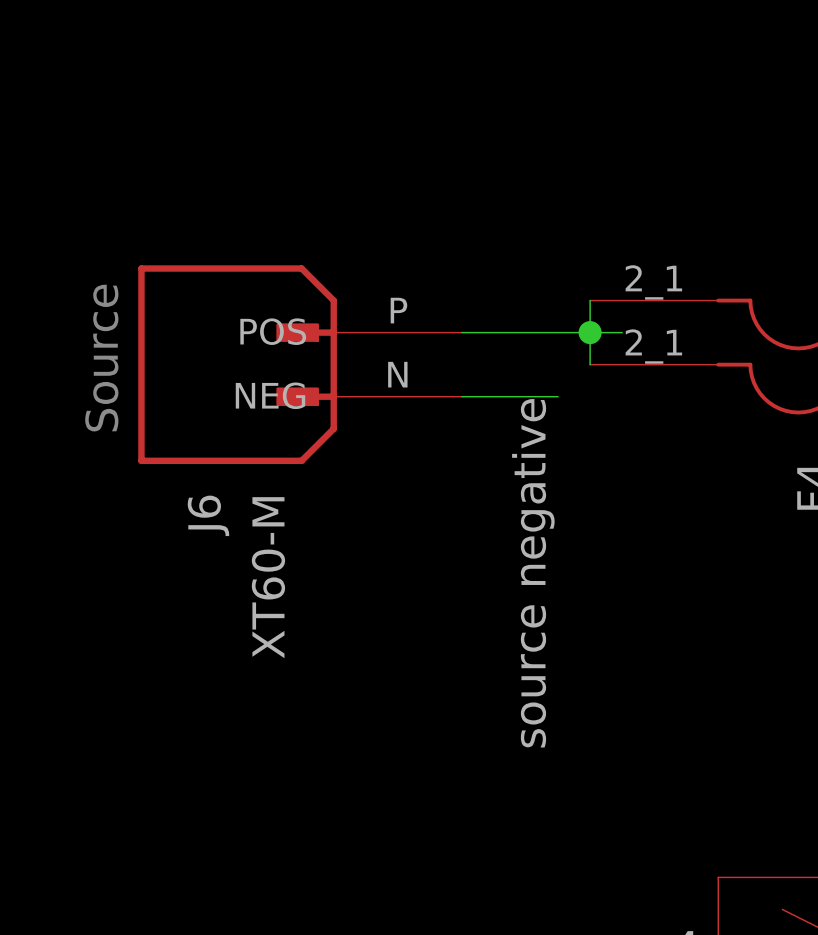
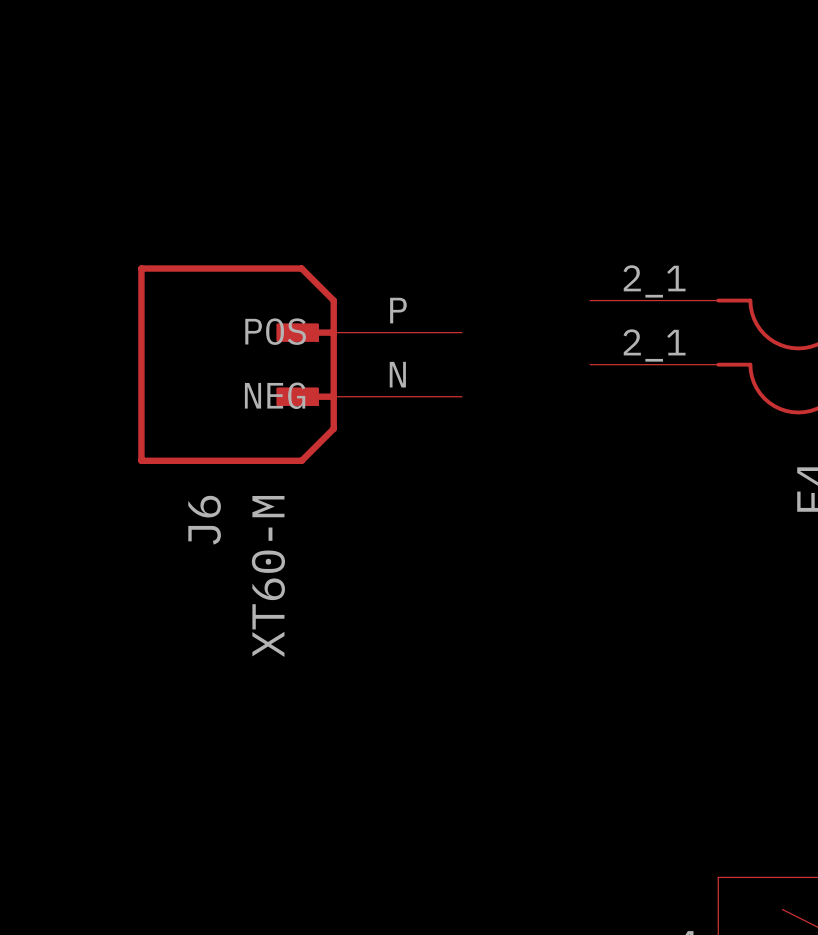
wire: (590, 300) (590, 364) -> none
wire: (461, 332) (622, 332) -> none
junction: (590, 332) -> none
text: Source (101, 358) -> none
wire: (461, 396) (558, 396) -> none
label: source negative (533, 573) -> none

